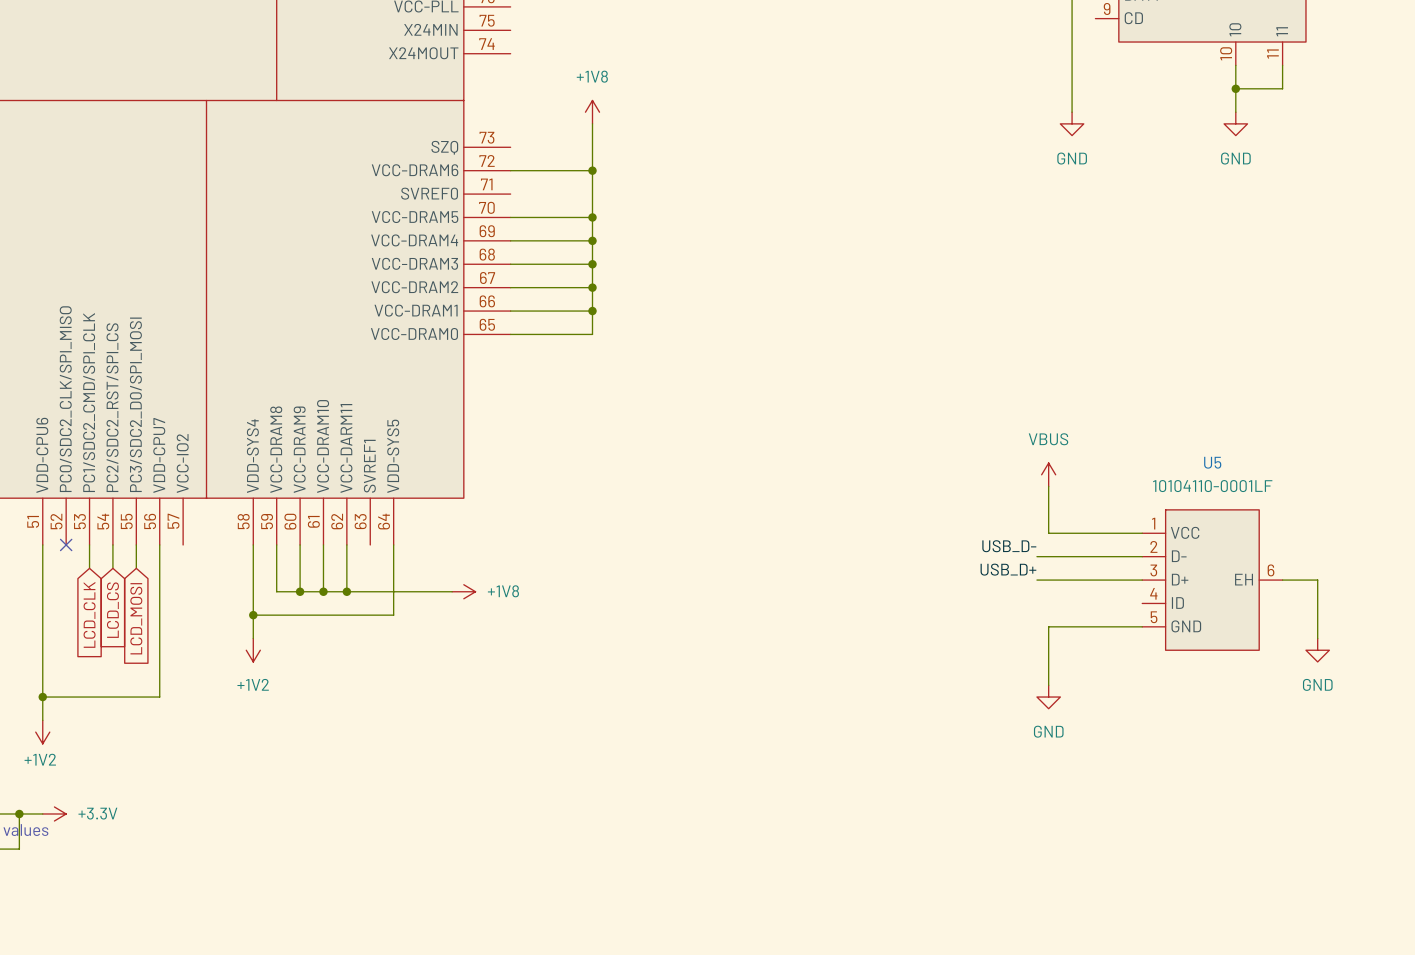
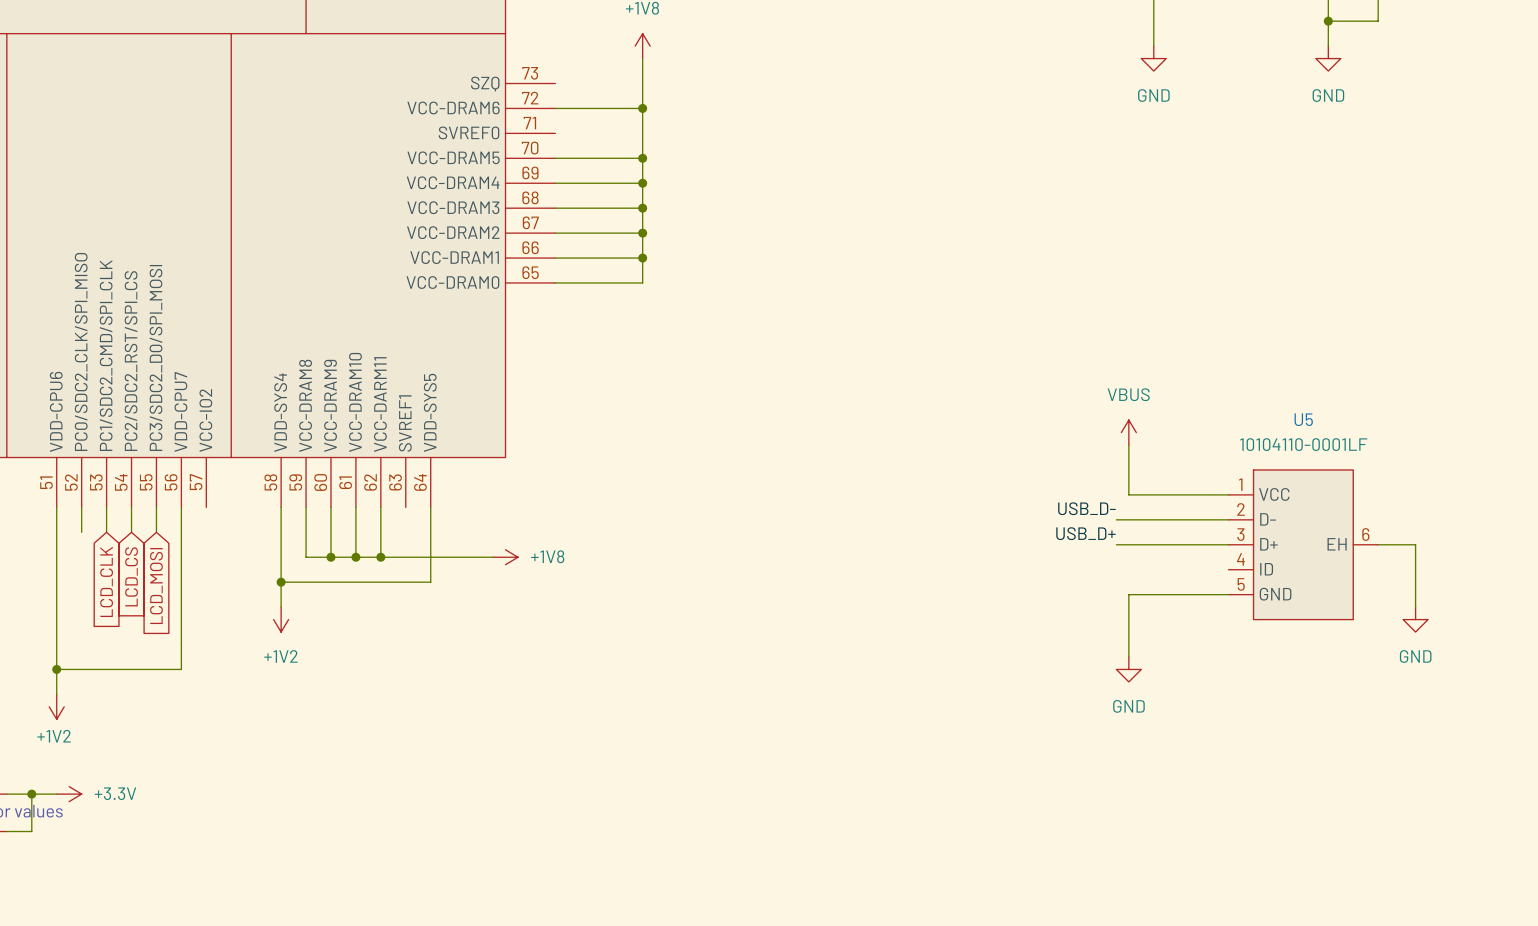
wire: none -> (81, 507) (81, 532)
no-connect mark: (66, 544) -> none

